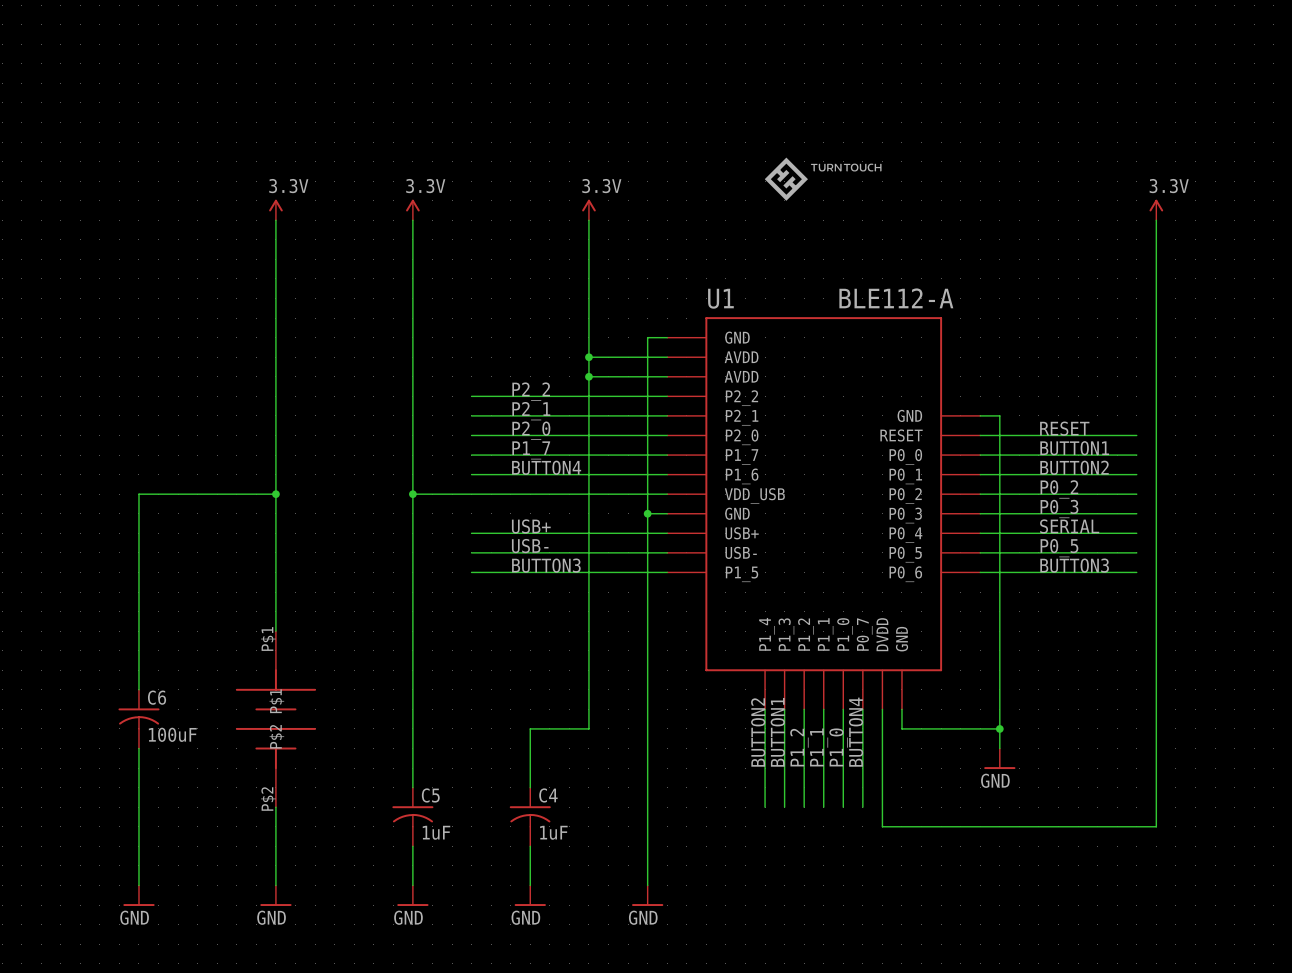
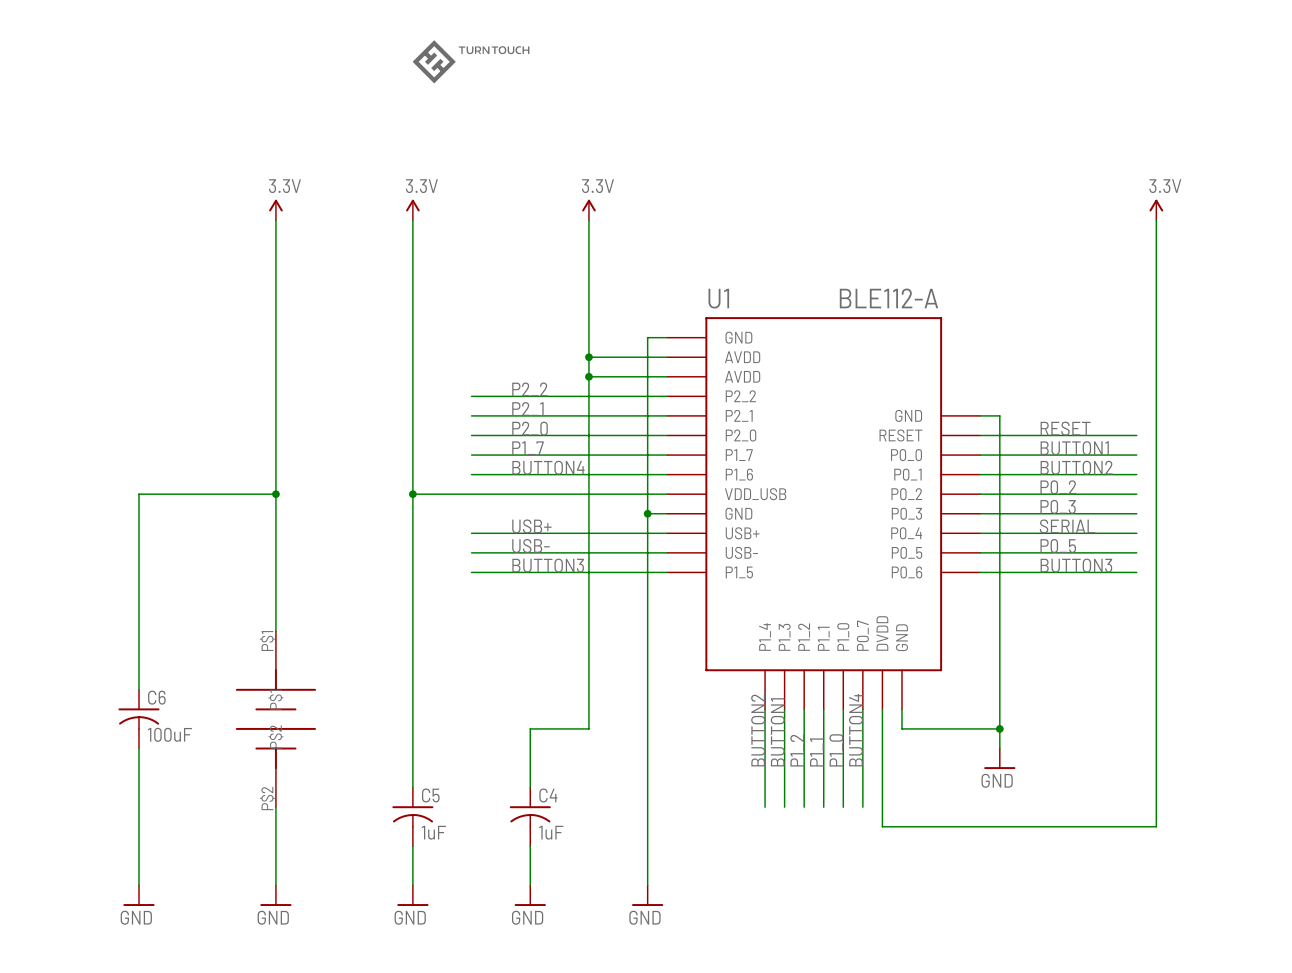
part: none -> (471, 61)
part: (823, 179) -> none

